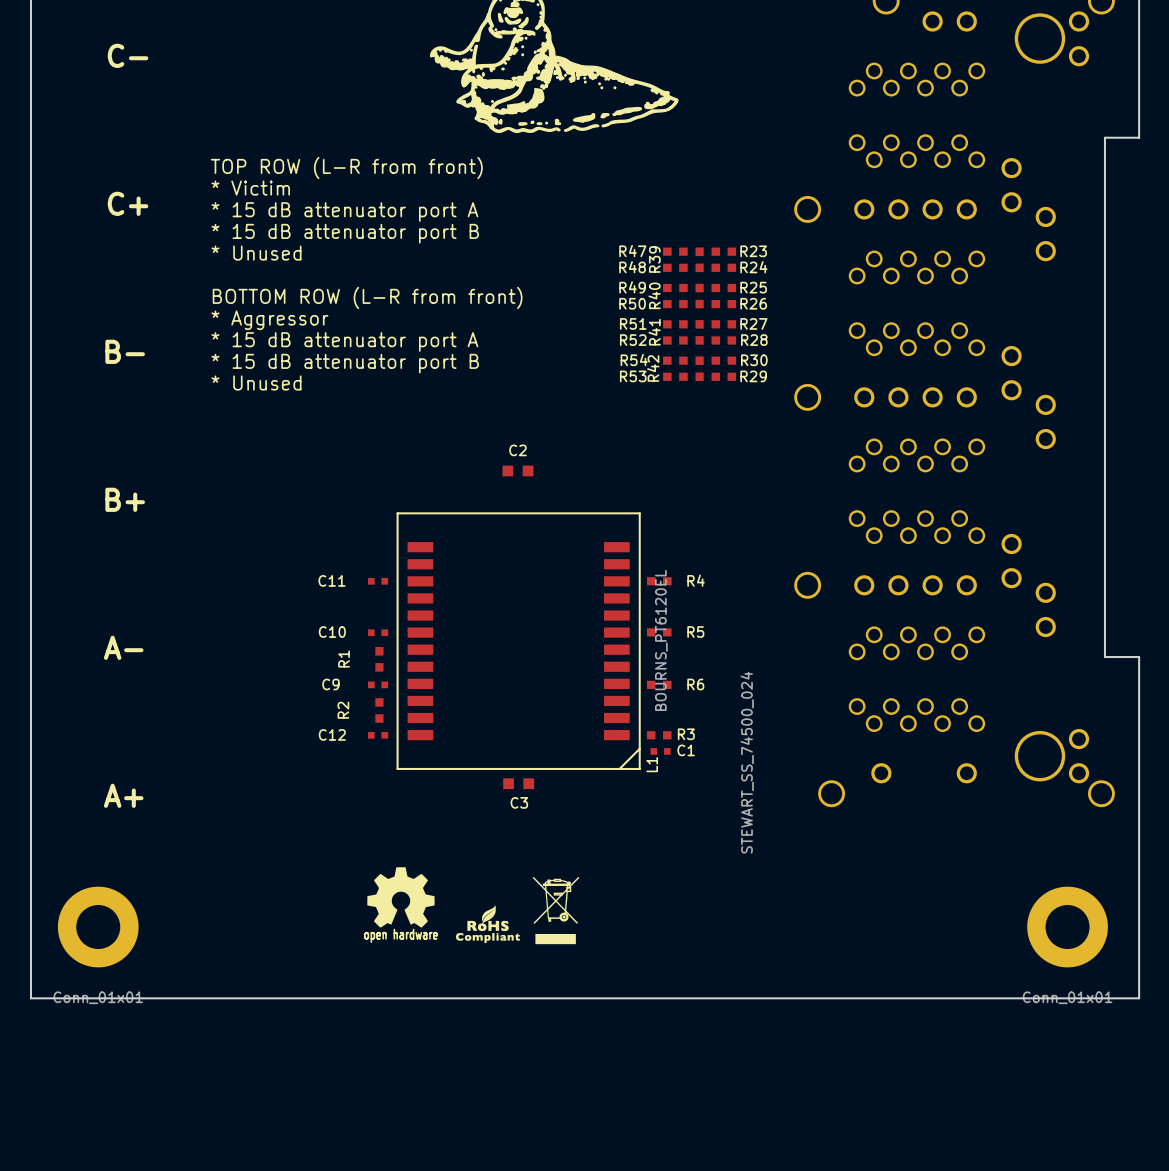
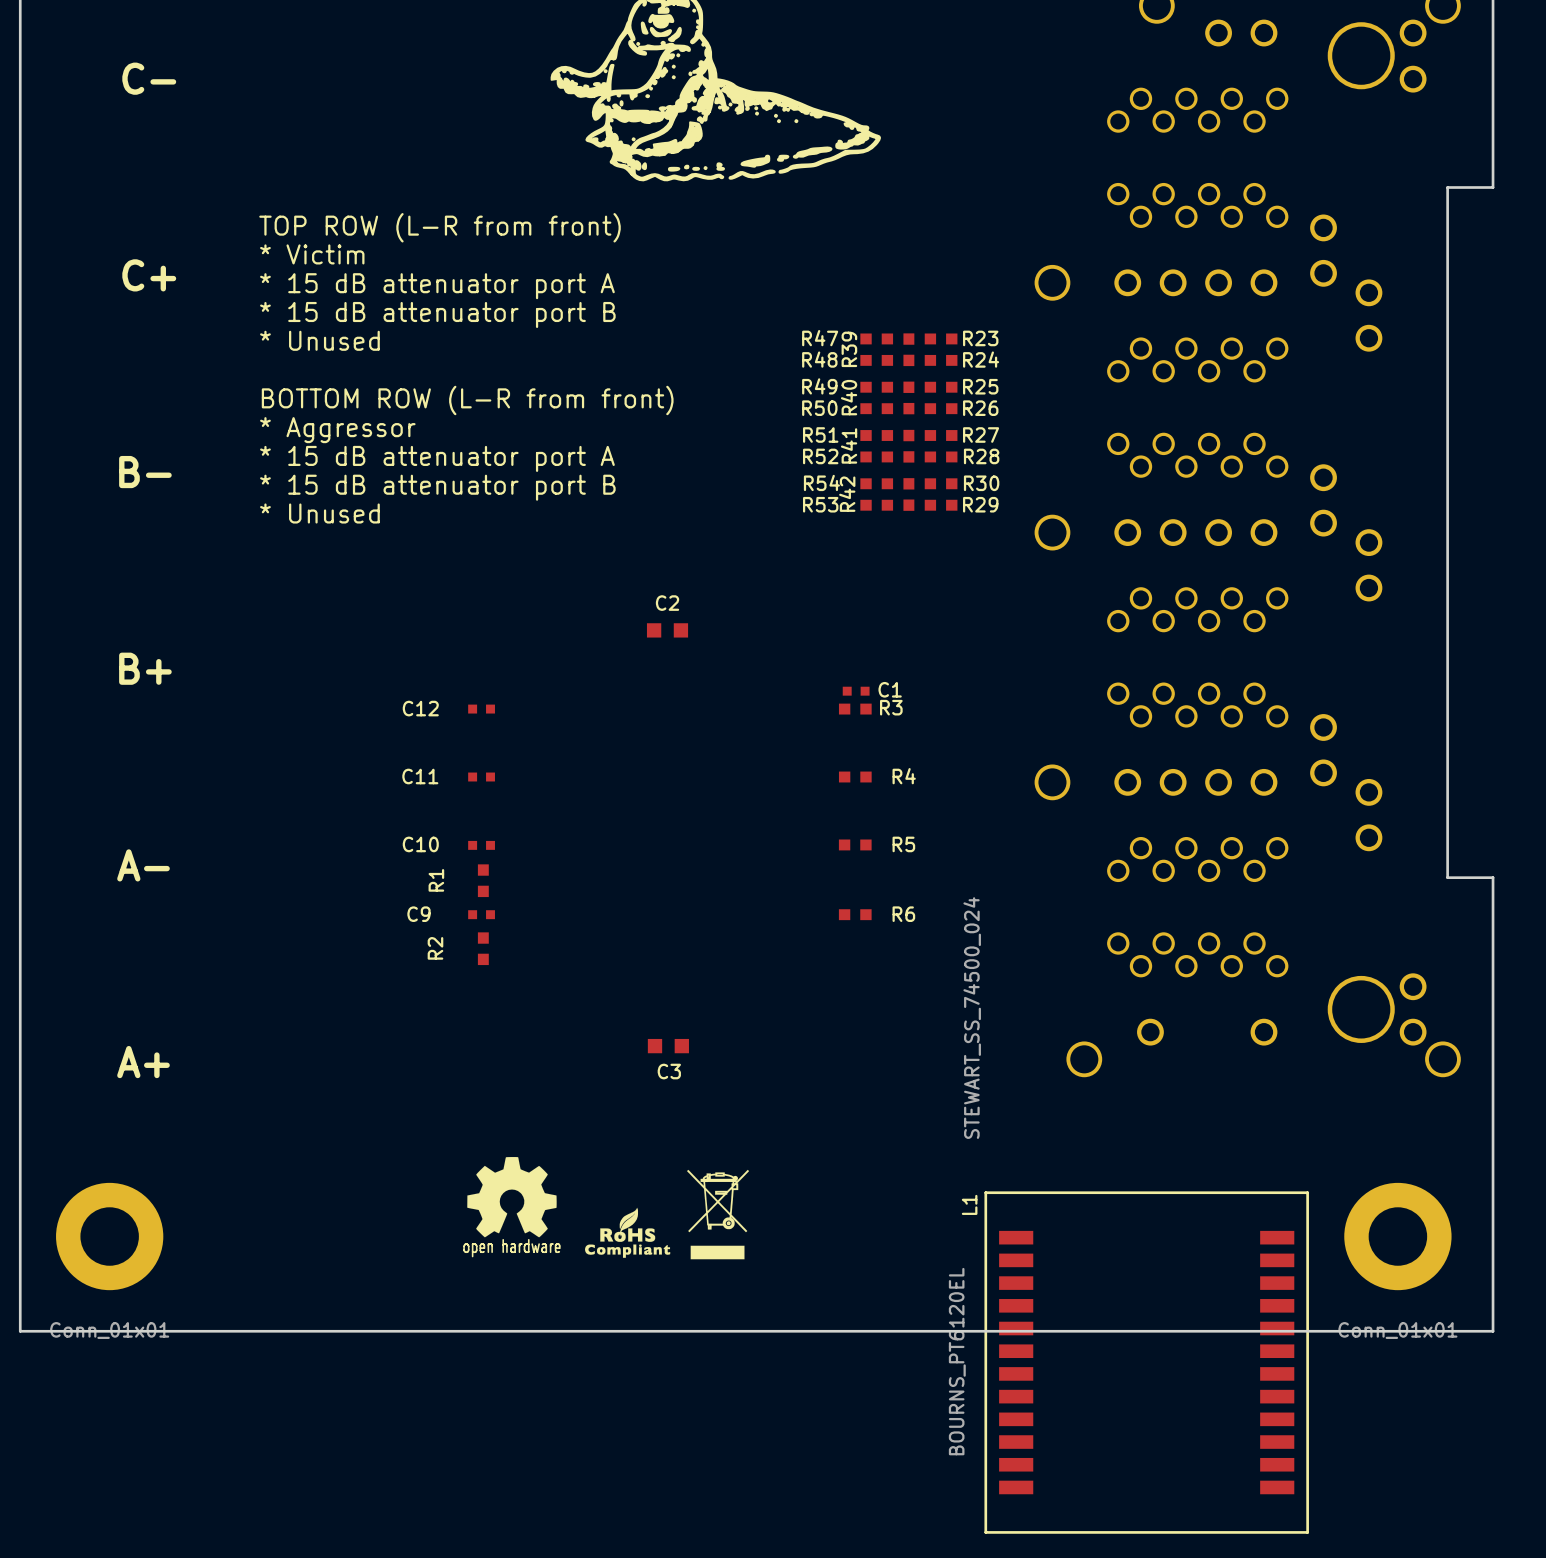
L1 footprint: [396, 512, 641, 770] -> [984, 1191, 1309, 1534]
L1 value position: BOURNS_PT6120EL (661, 640) -> BOURNS_PT6120EL (957, 1361)
C12 position: (378, 735) -> (481, 709)
R3 position: (659, 735) -> (855, 709)
C1 position: (660, 751) -> (856, 691)
L1 name position: L1 (652, 764) -> L1 (969, 1204)

